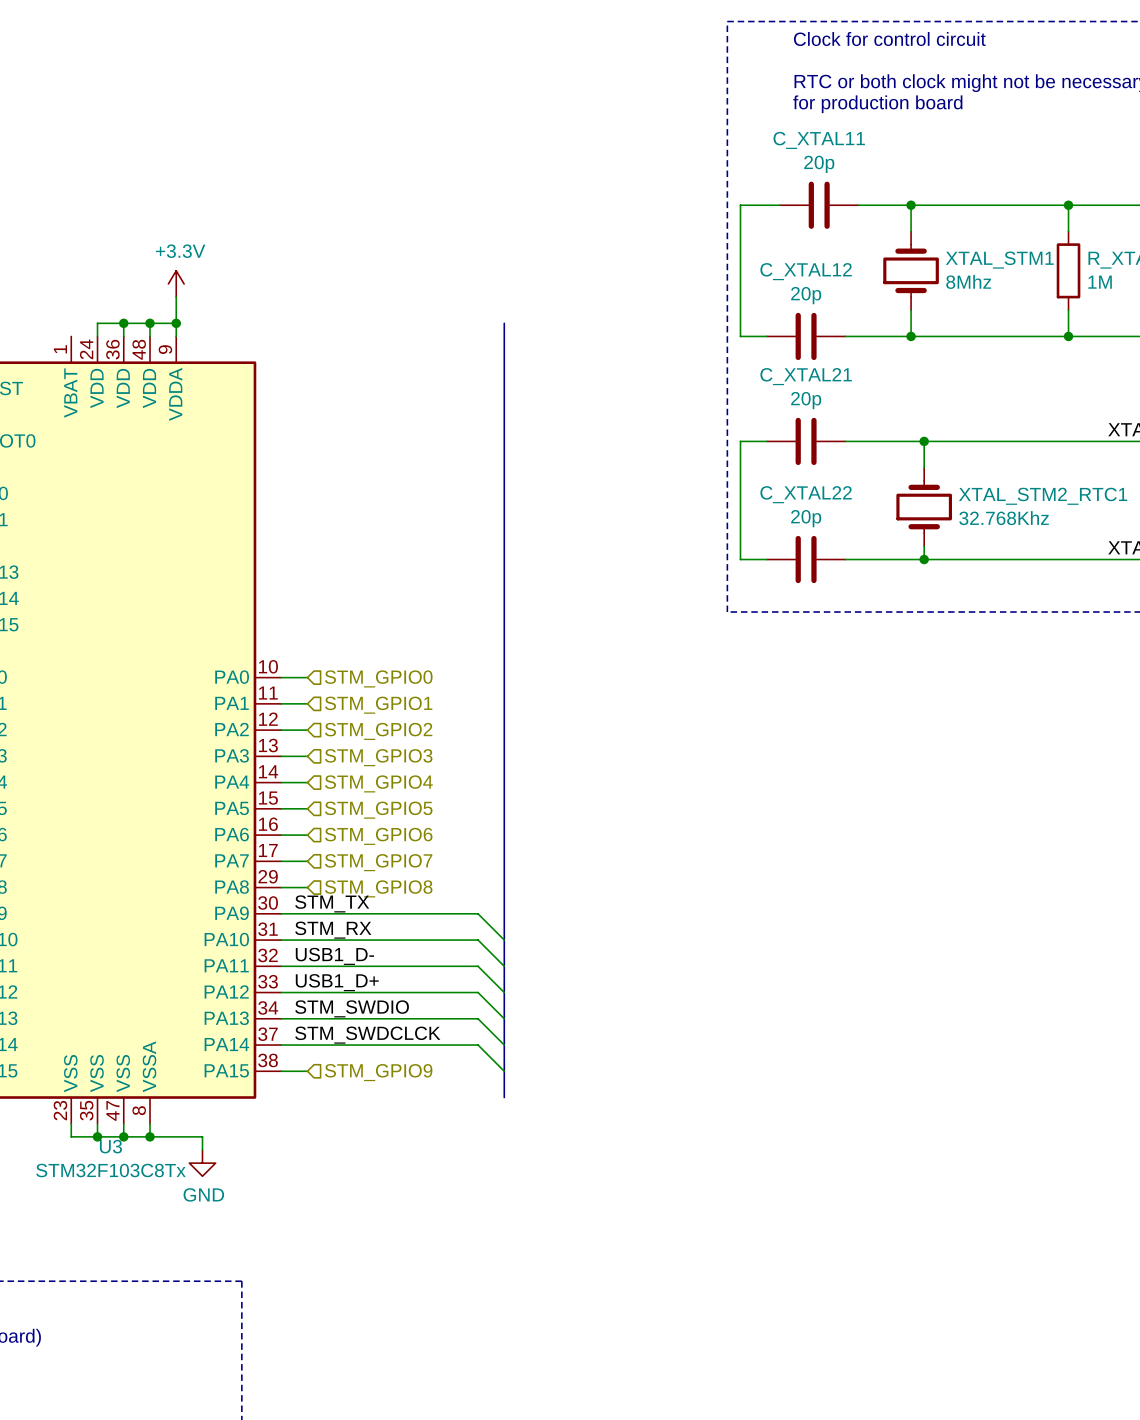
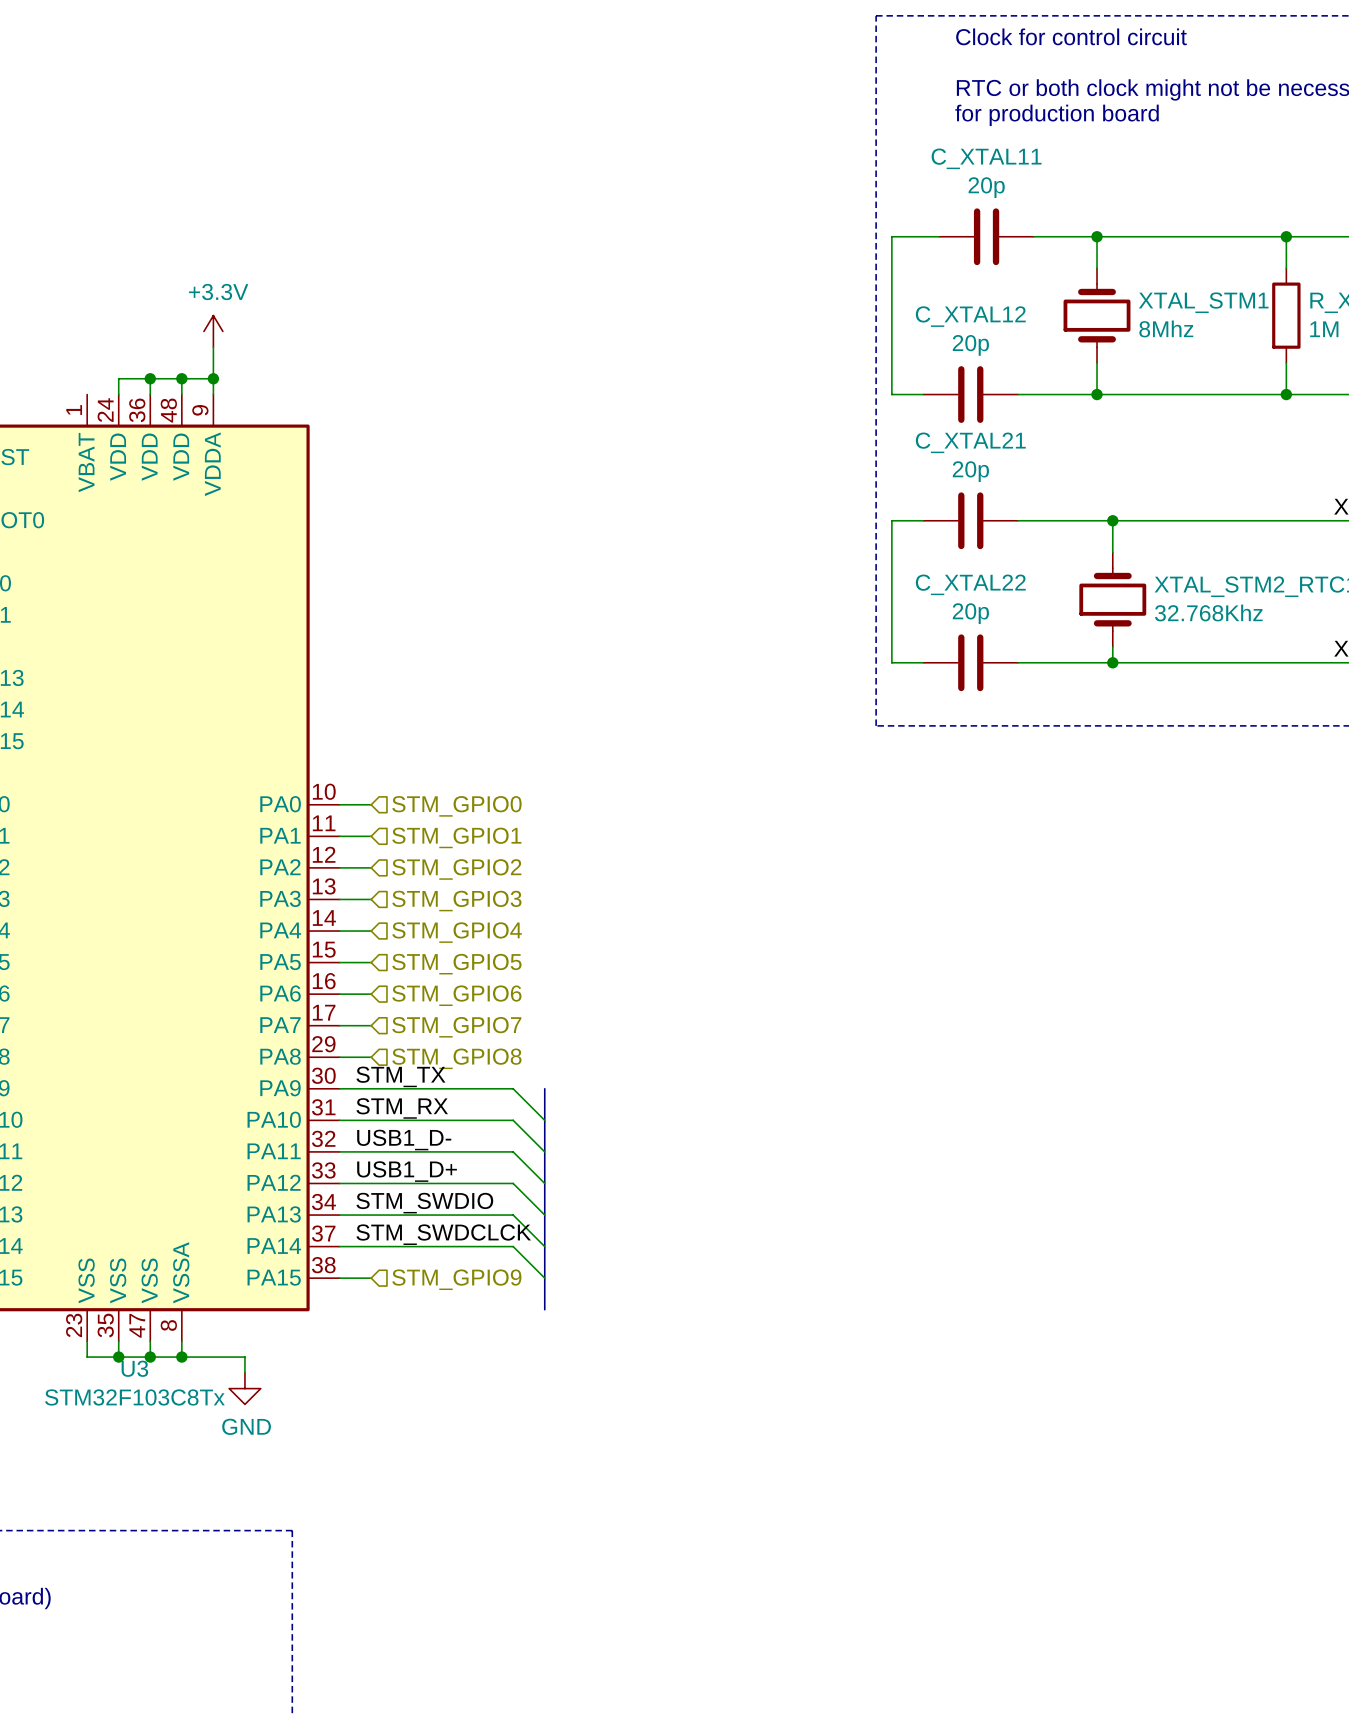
bus: (504, 323) (504, 1097) -> none
wire: (425, 913) (478, 913) (504, 940) -> (513, 1088) (544, 1120)
bus: none -> (544, 1088) (544, 1309)
wire: (425, 940) (478, 940) (504, 966) -> (513, 1120) (544, 1151)
wire: (425, 966) (478, 966) (504, 992) -> (513, 1151) (544, 1183)
wire: (425, 992) (478, 992) (504, 1018) -> (513, 1183) (544, 1215)
wire: (425, 1018) (478, 1018) (504, 1045) -> (513, 1215) (544, 1246)
wire: (425, 1045) (478, 1045) (504, 1071) -> (513, 1246) (544, 1278)

